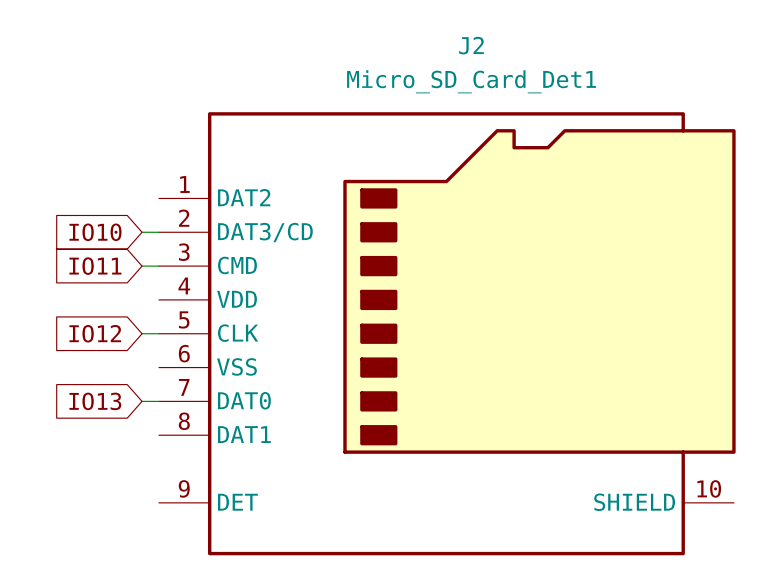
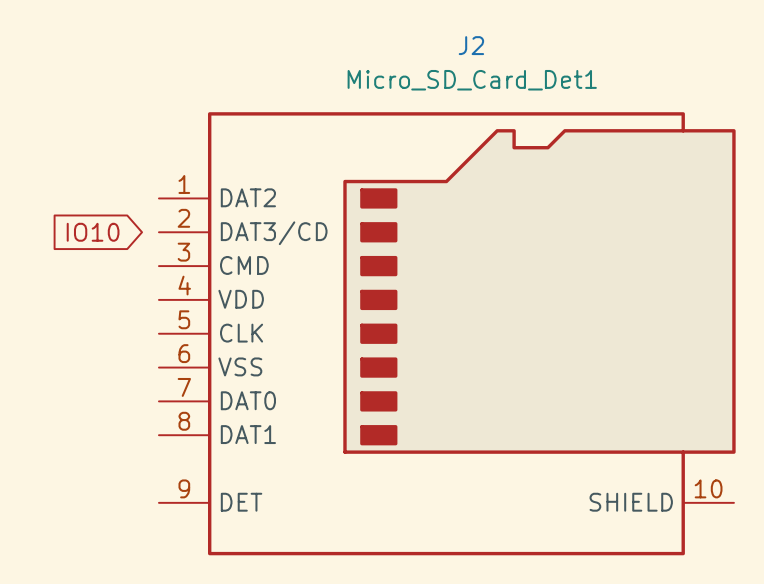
wire: (142, 232) (158, 232) -> none
global label: IO11 (95, 266) -> none
wire: (142, 266) (158, 266) -> none
global label: IO12 (95, 333) -> none
wire: (142, 333) (158, 333) -> none
global label: IO13 (95, 401) -> none
wire: (142, 401) (158, 401) -> none

